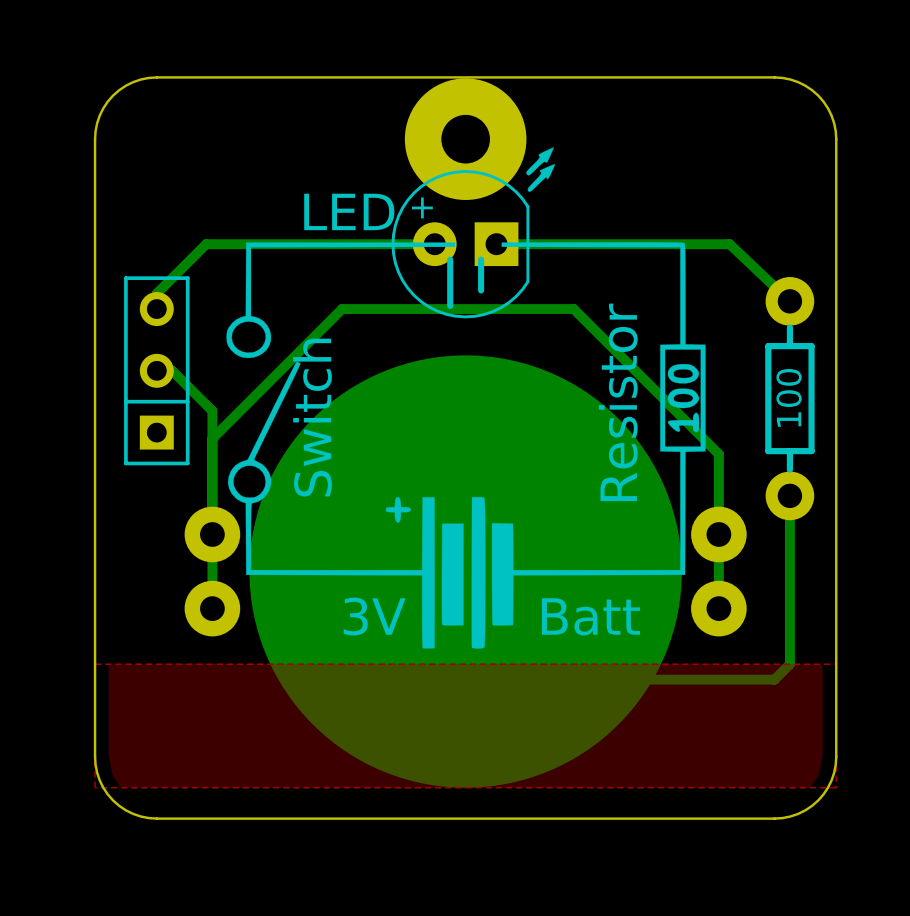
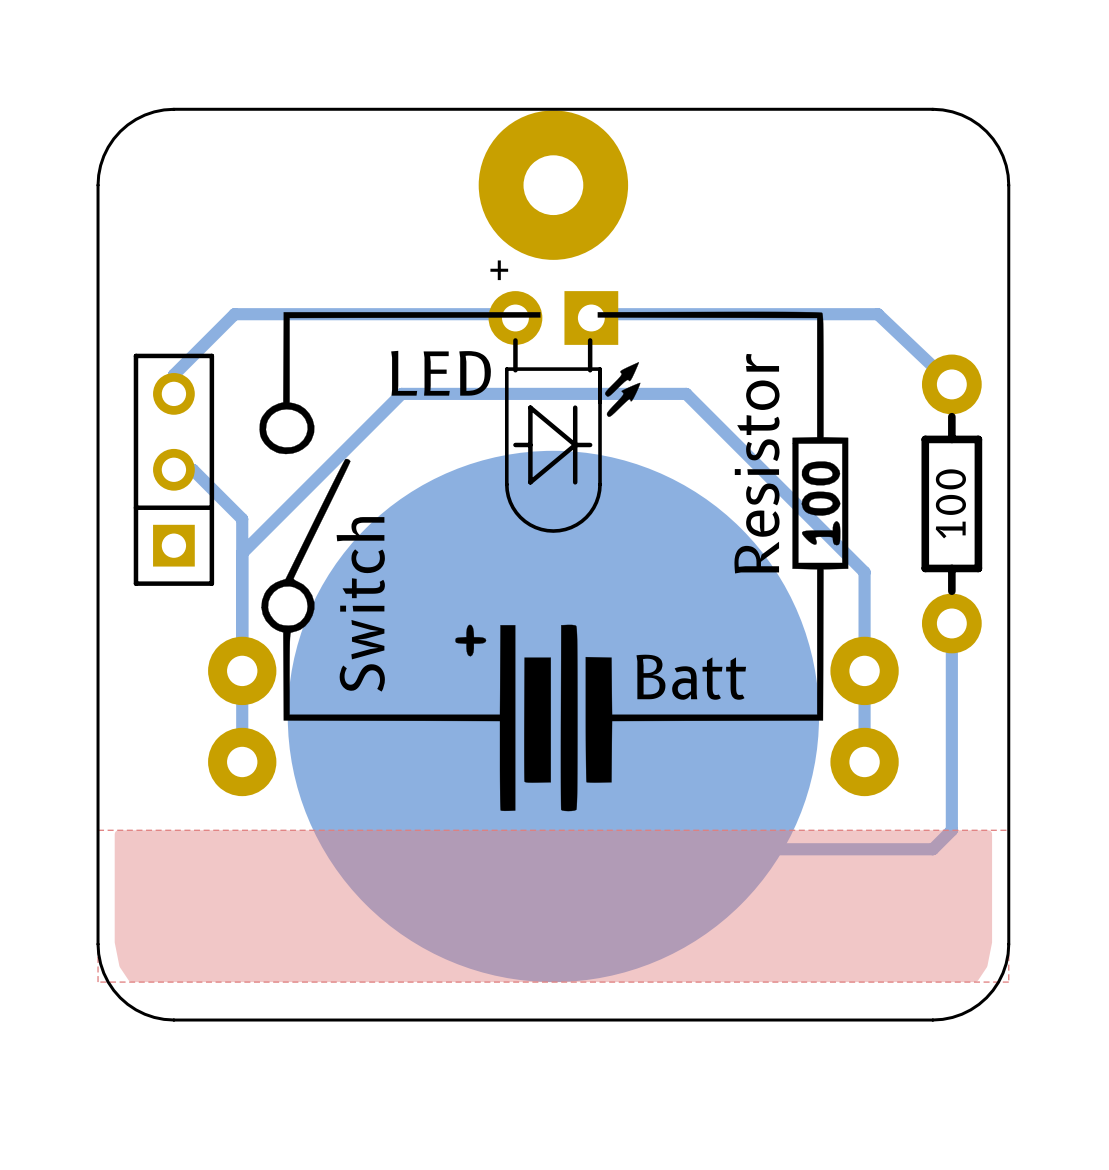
drawing position: (540, 169) -> (622, 389)
text position: LED (349, 211) -> LED (441, 373)
part: (460, 244) -> none
part: none -> (553, 411)
text position: Resistor (618, 402) -> Resistor (757, 463)
text position: Switch (312, 417) -> Switch (360, 604)
text: 3V (374, 616) -> none
text position: Batt (591, 616) -> Batt (691, 677)

